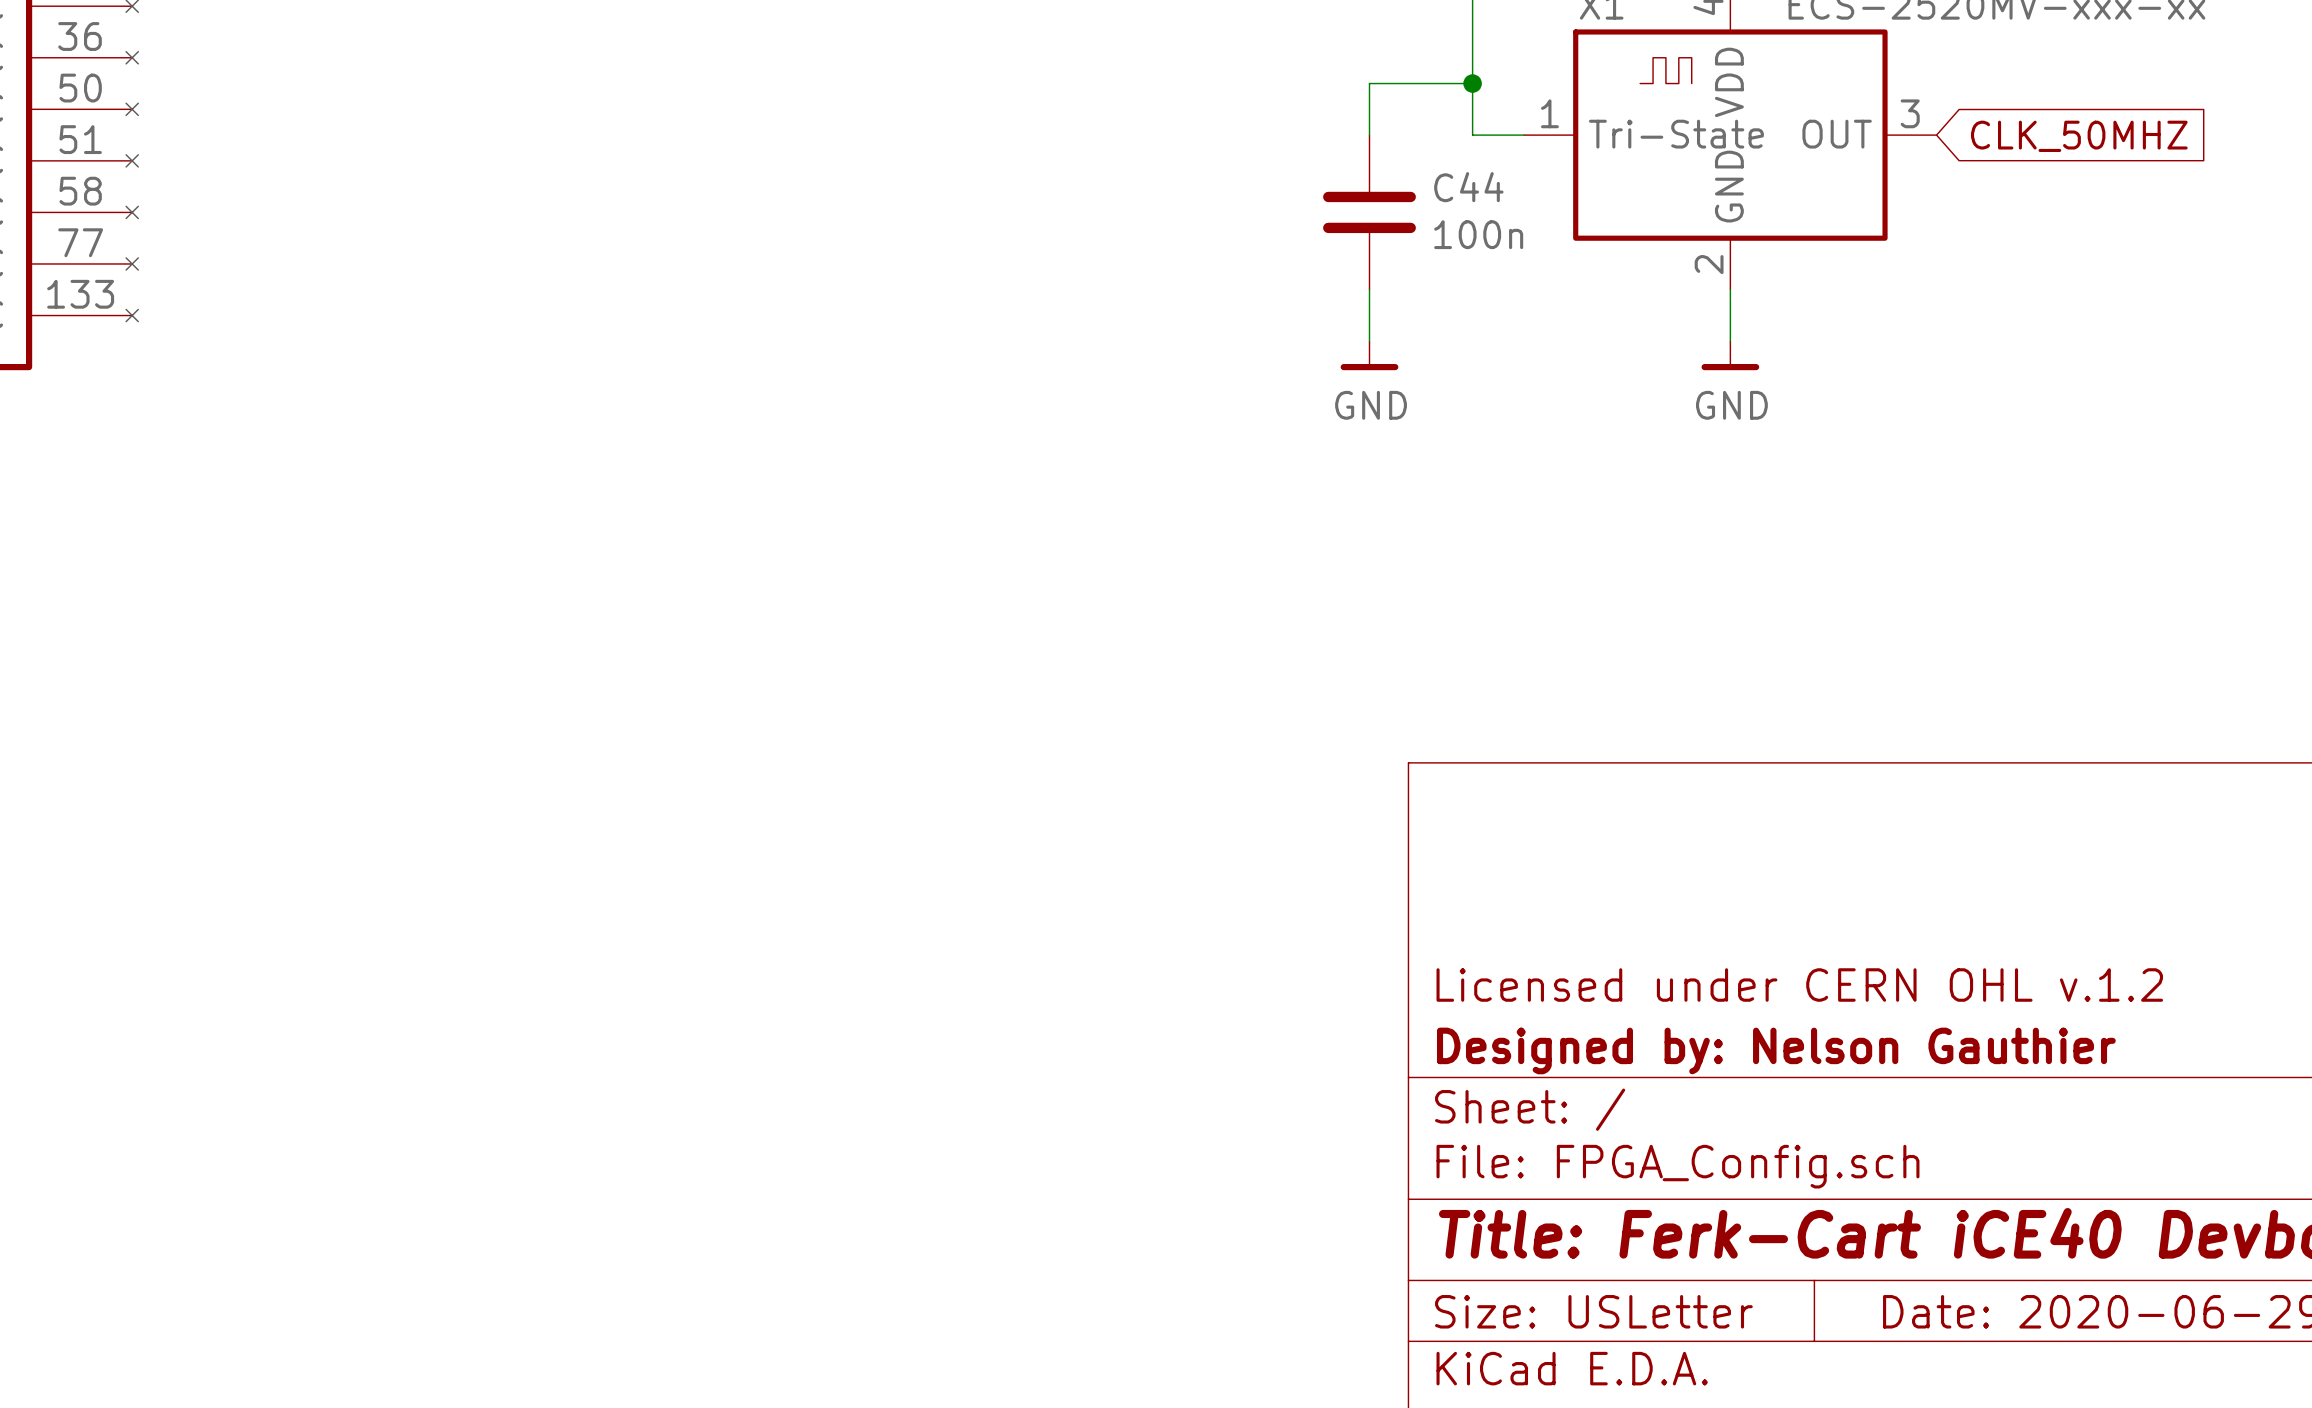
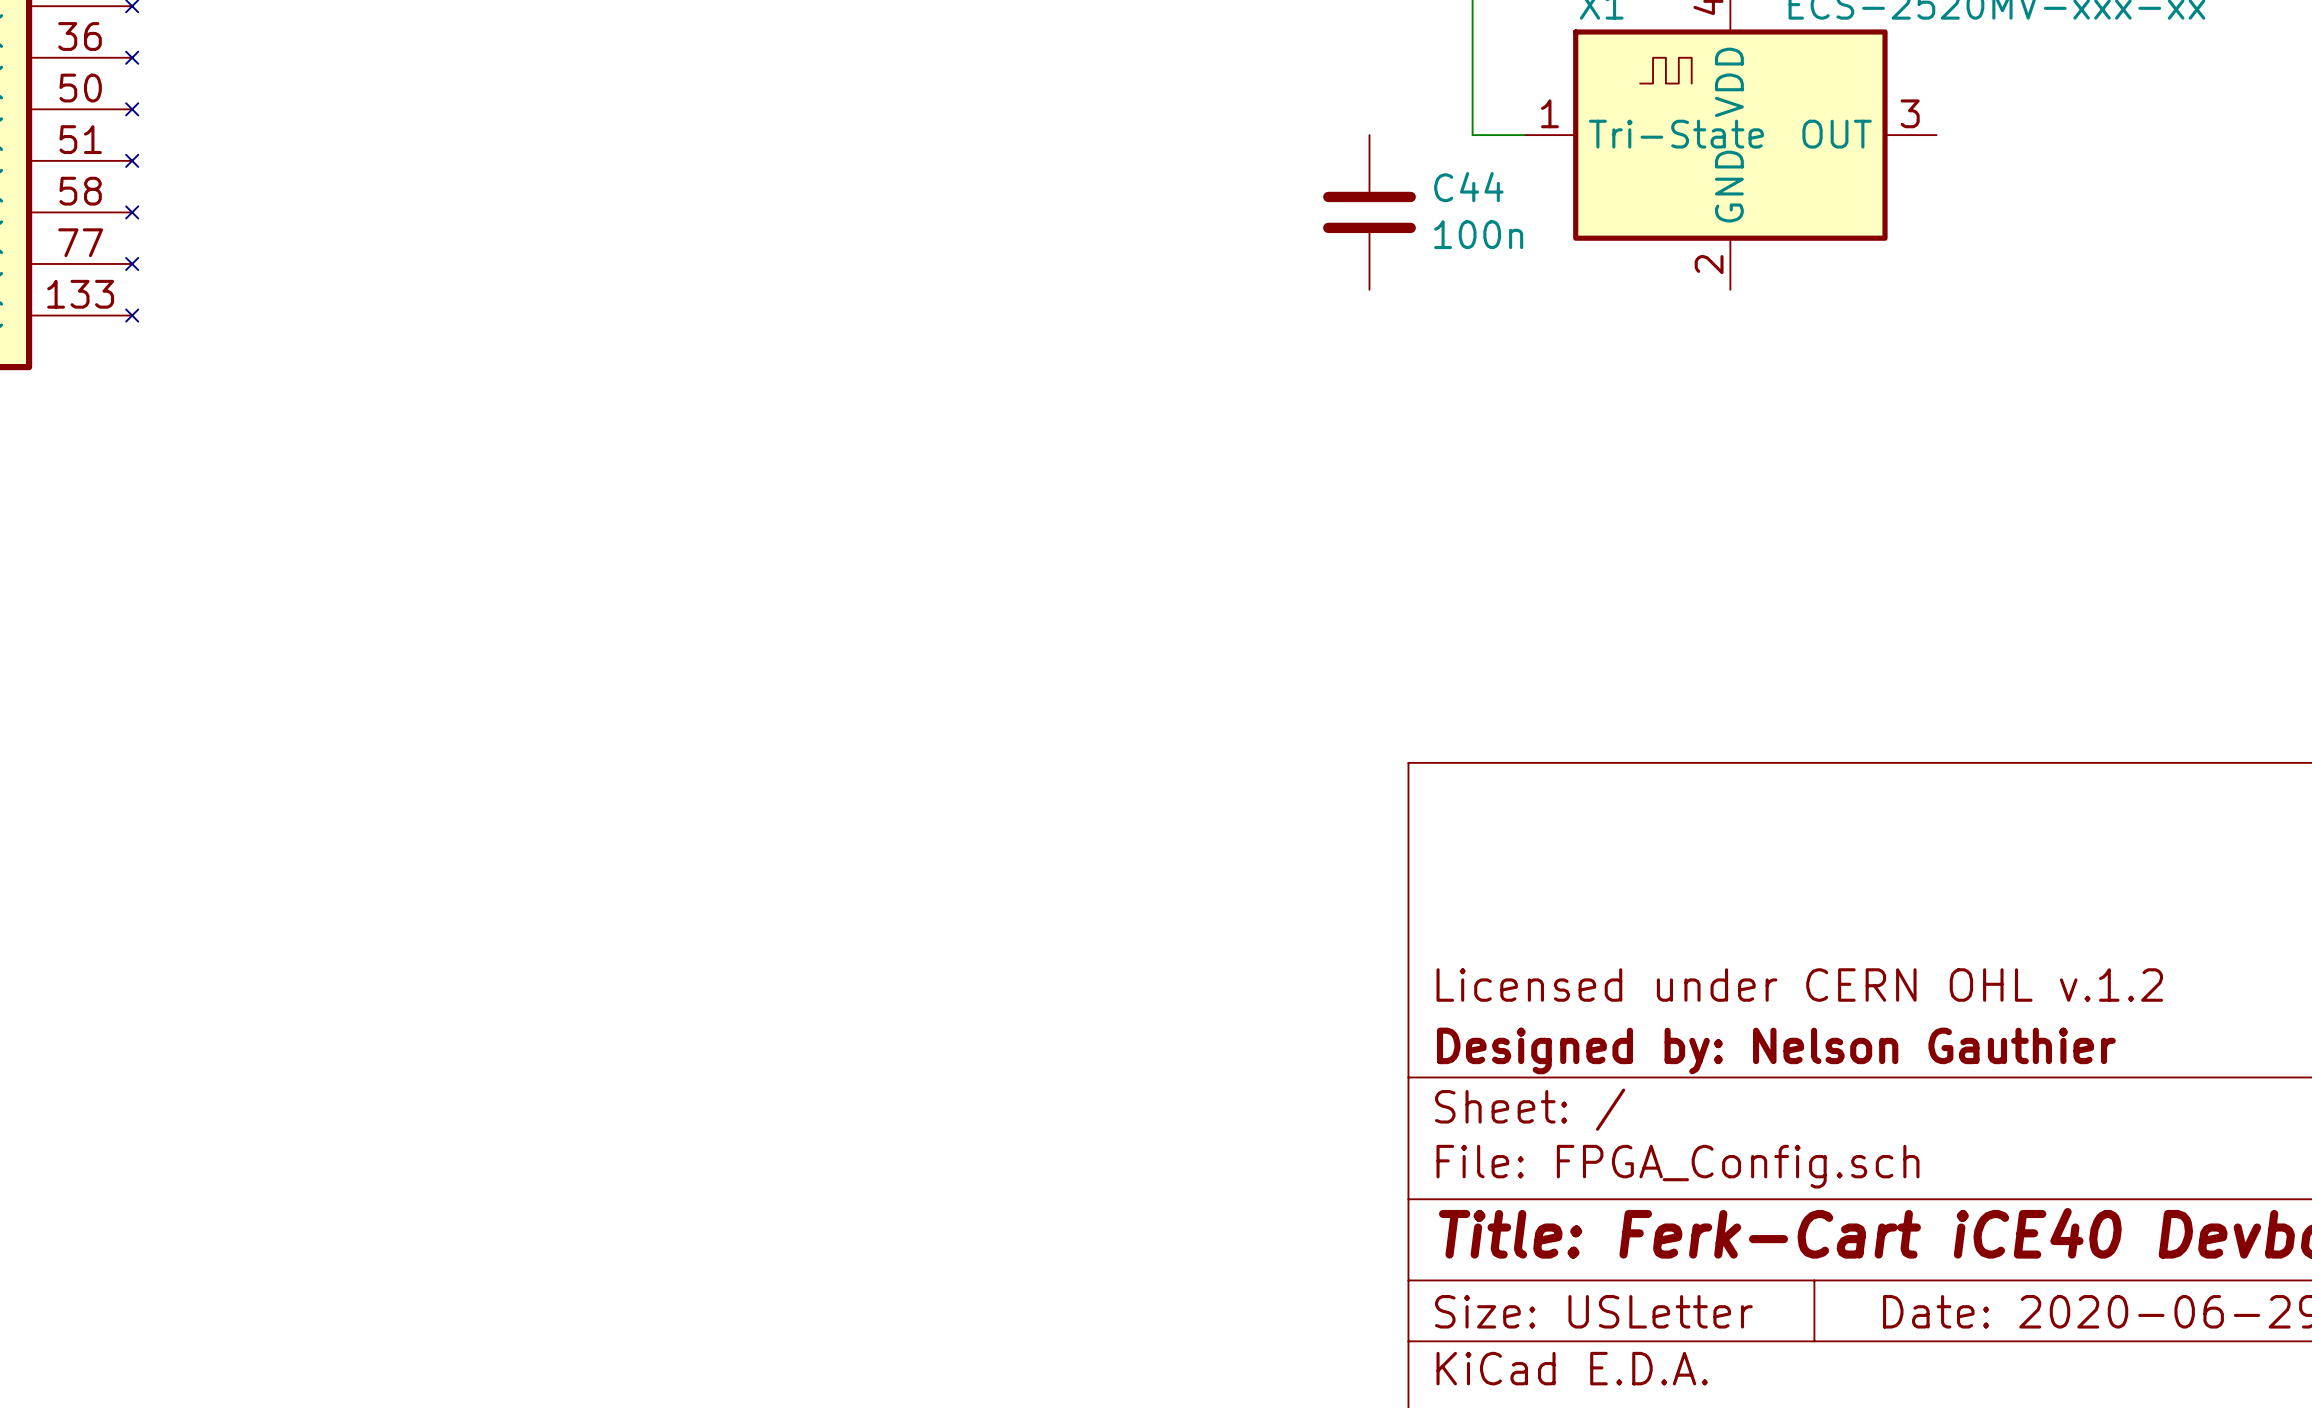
wire: (1472, 83) (1369, 83) (1369, 135) -> none
junction: (1472, 83) -> none
global label: CLK_50MHZ (2079, 136) -> none
wire: (1369, 289) (1369, 341) -> none
wire: (1730, 289) (1730, 341) -> none
power symbol: GND (1369, 355) -> none
power symbol: GND (1730, 355) -> none

